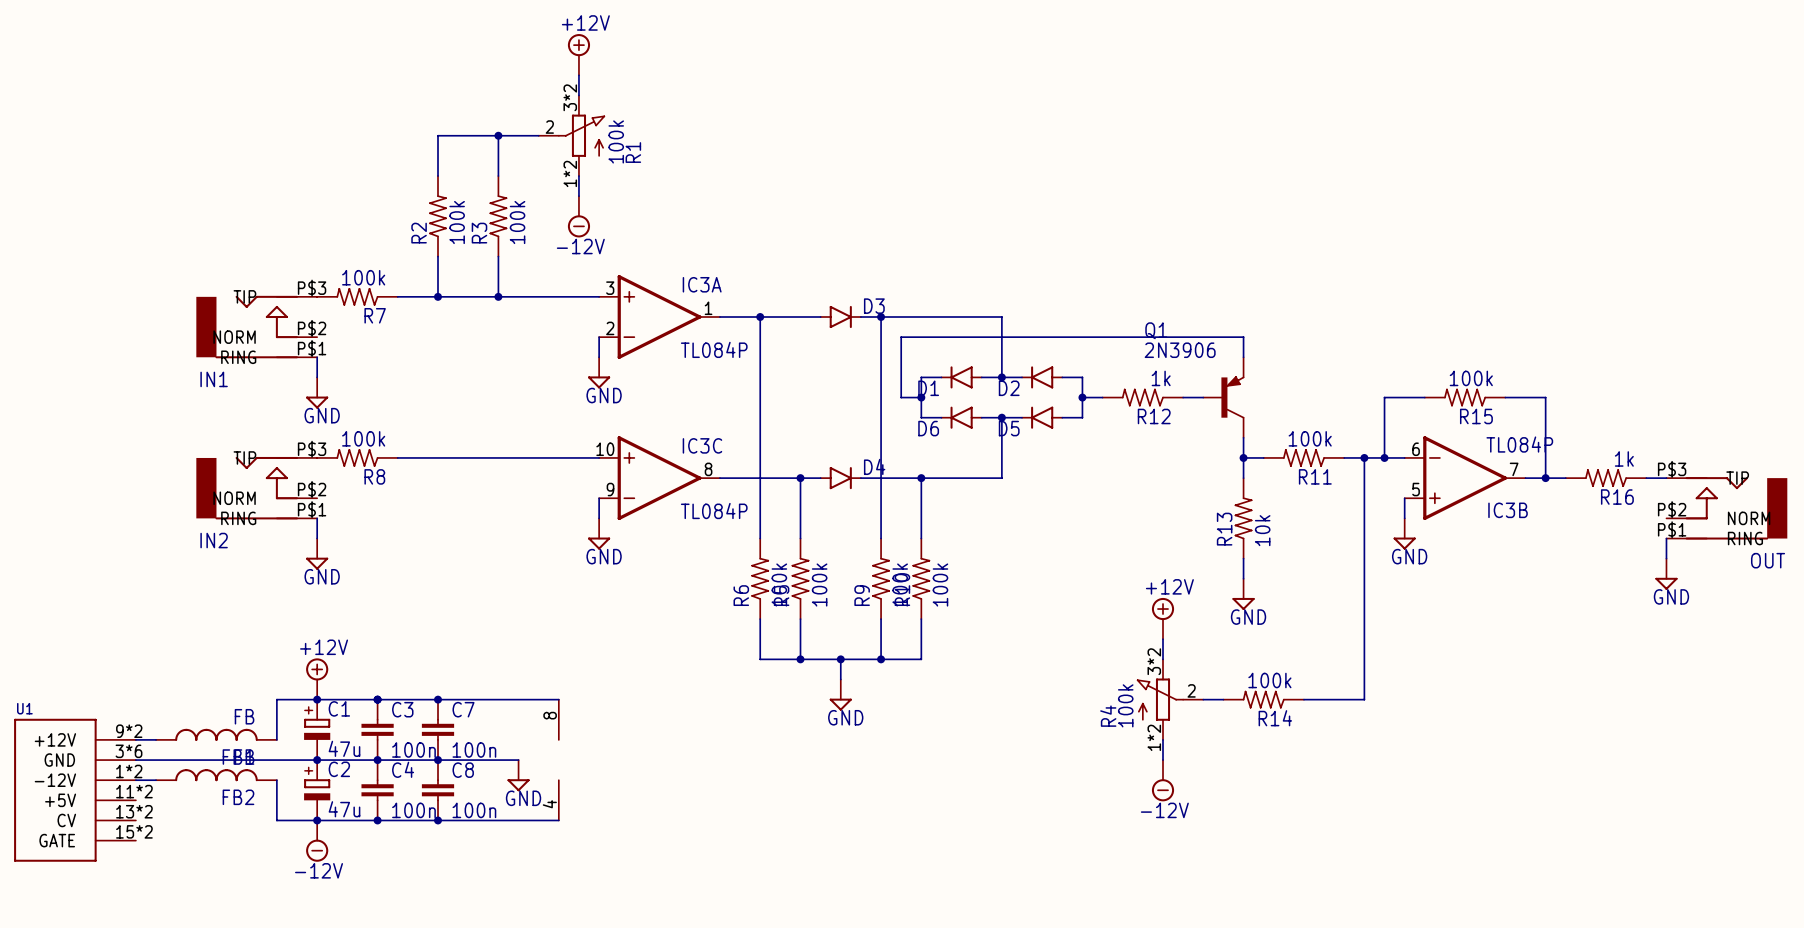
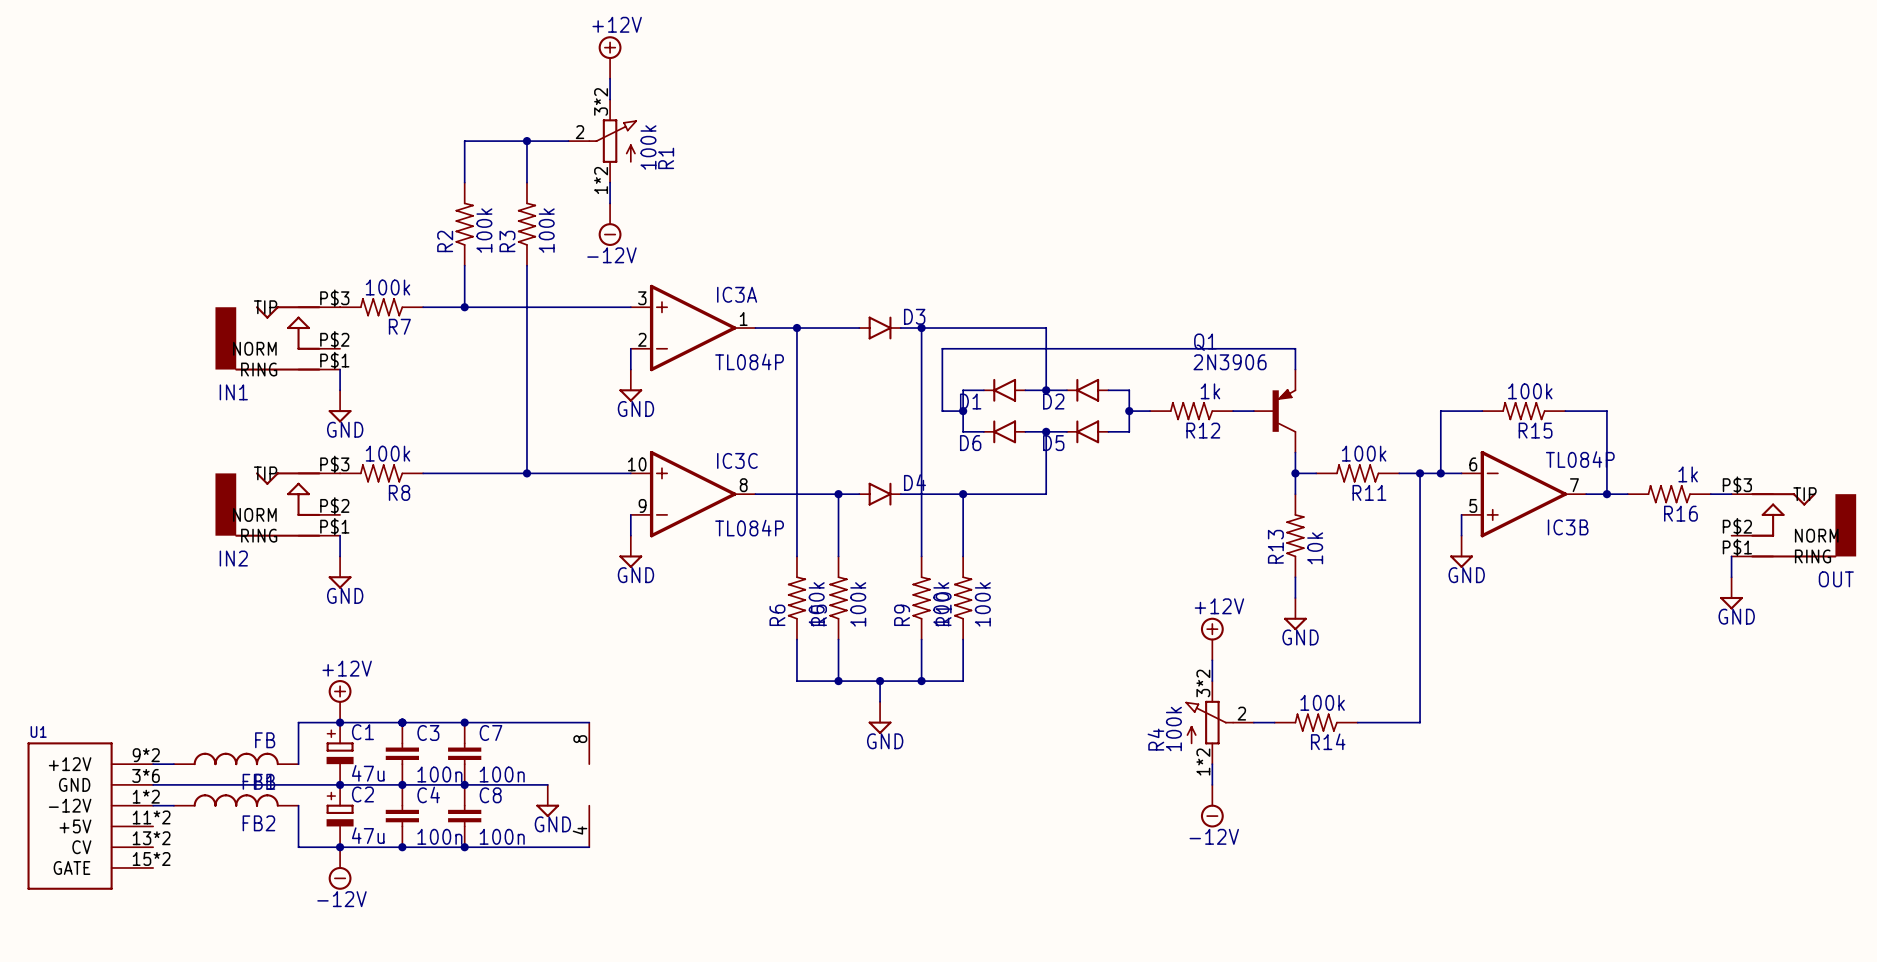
wire: none -> (526, 307) (526, 473)
junction: (498, 296) -> none
junction: none -> (526, 473)

